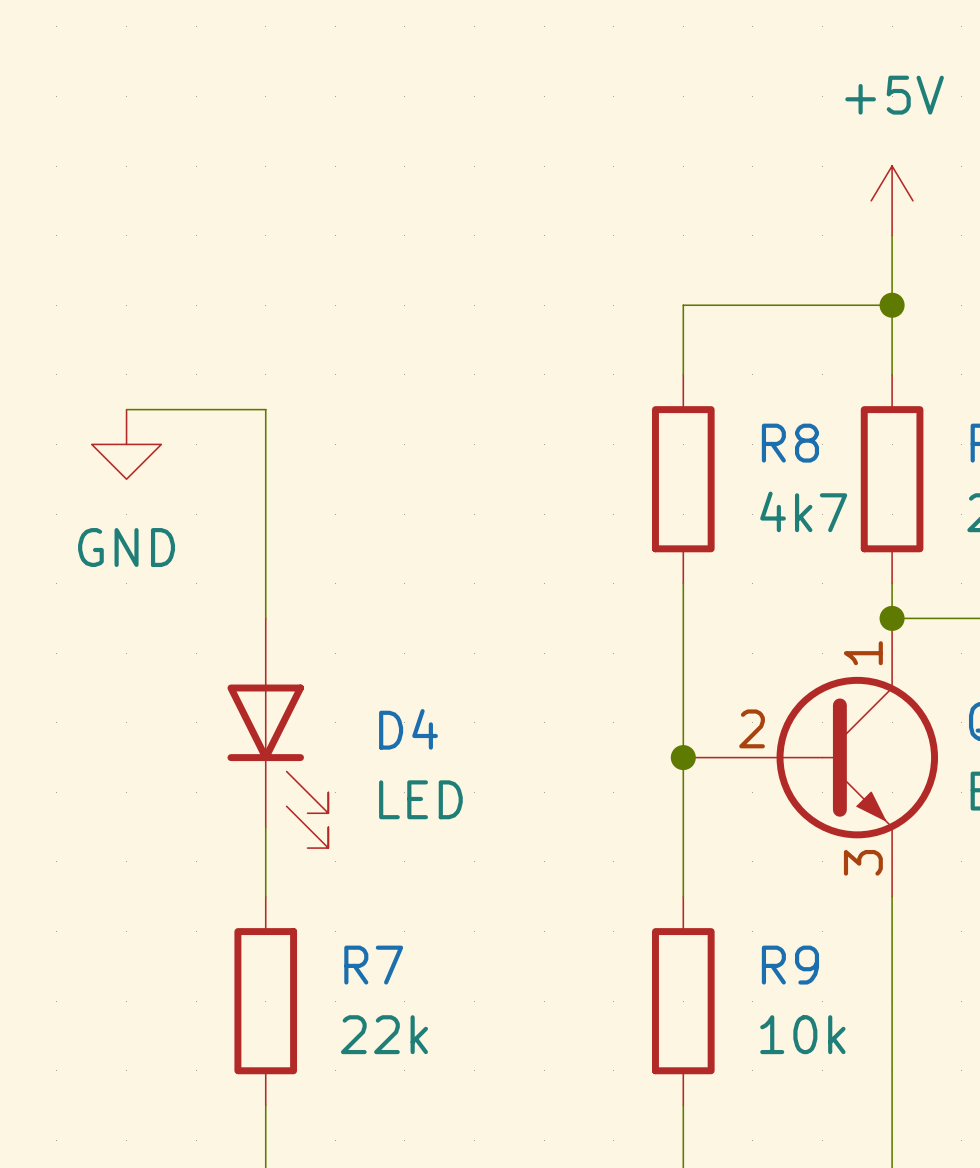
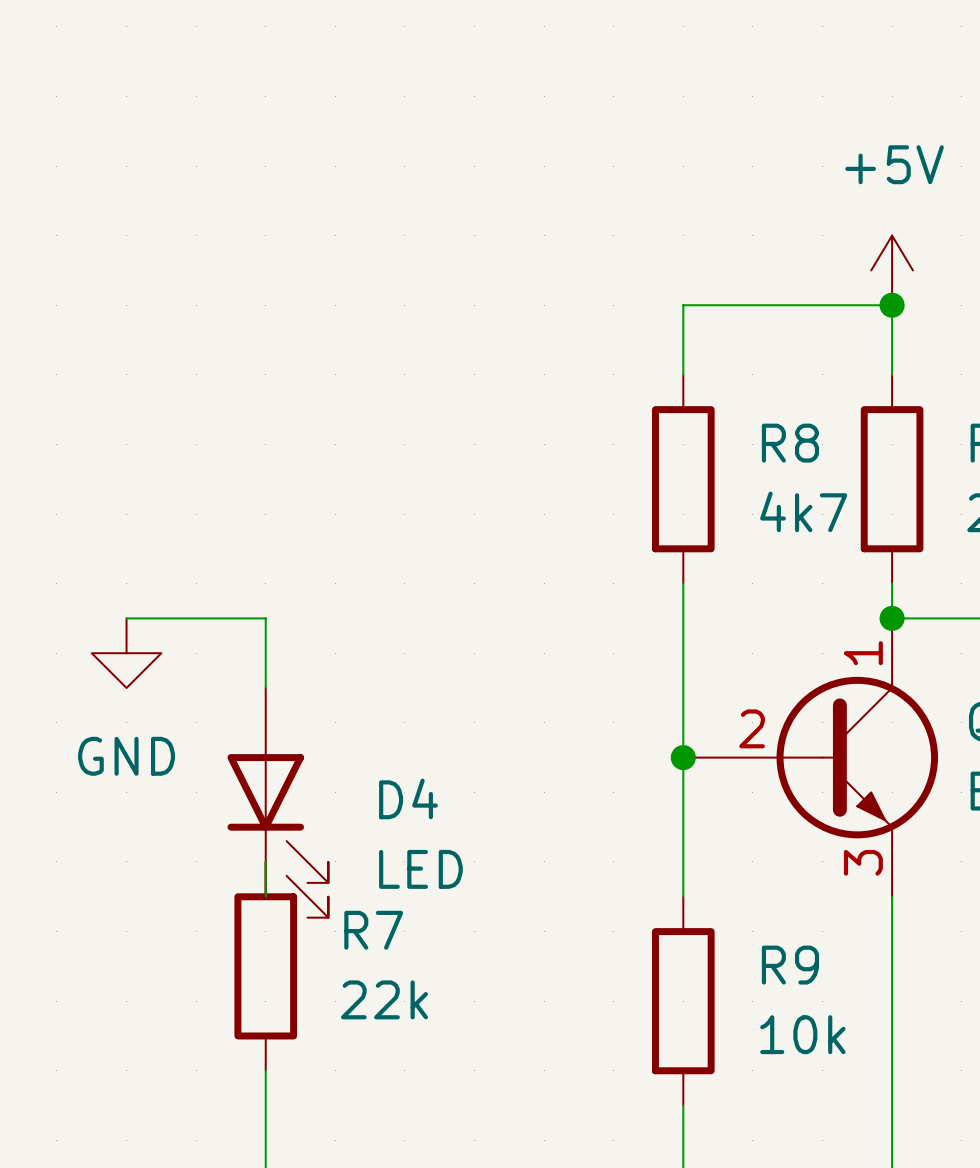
power symbol position: +5V (892, 200) -> +5V (892, 270)
wire: (126, 409) (265, 409) (265, 618) -> none
power symbol position: GND (126, 444) -> GND (126, 653)
wire: none -> (126, 618) (265, 618) (265, 688)
D4 position: (277, 733) -> (277, 802)
R7 position: (265, 1001) -> (265, 966)

